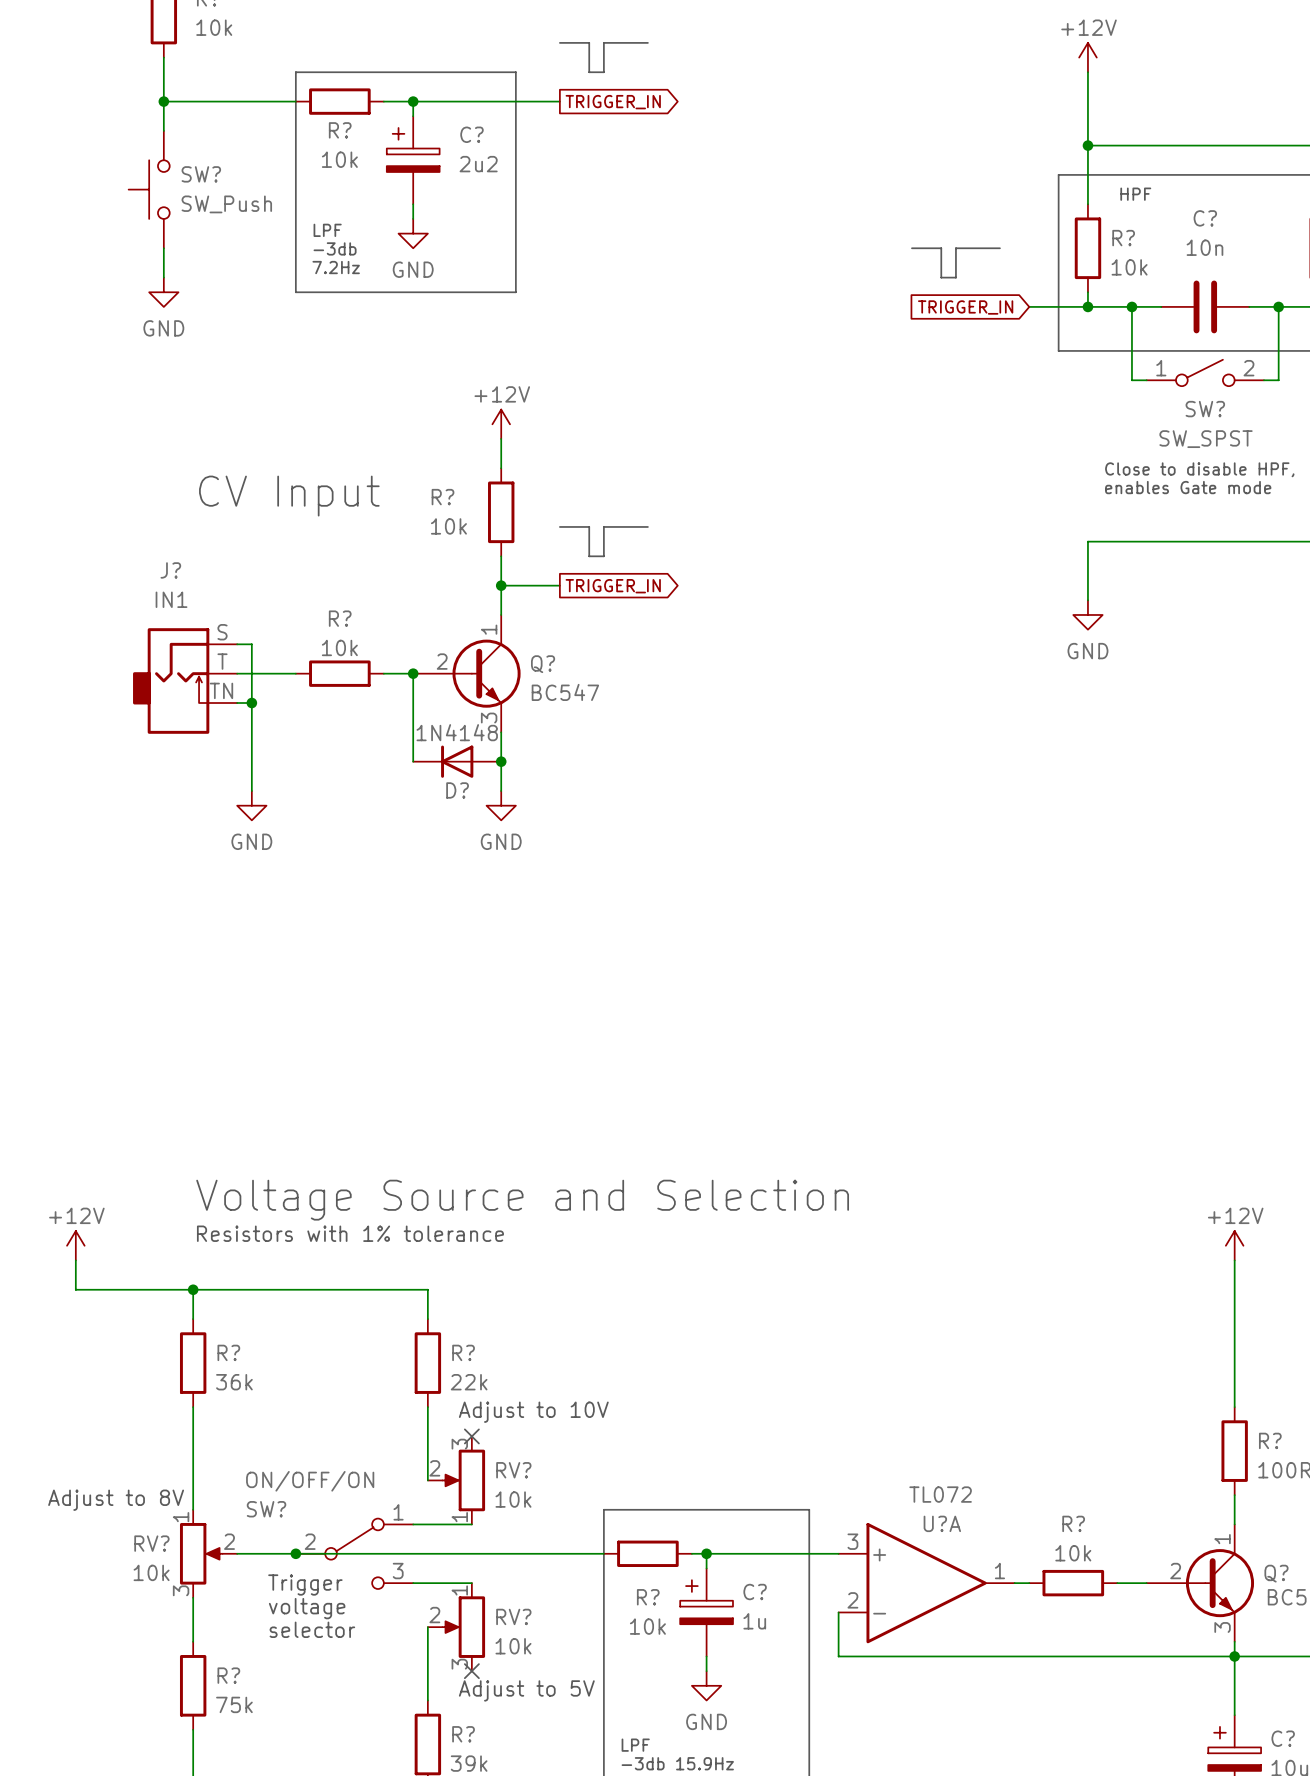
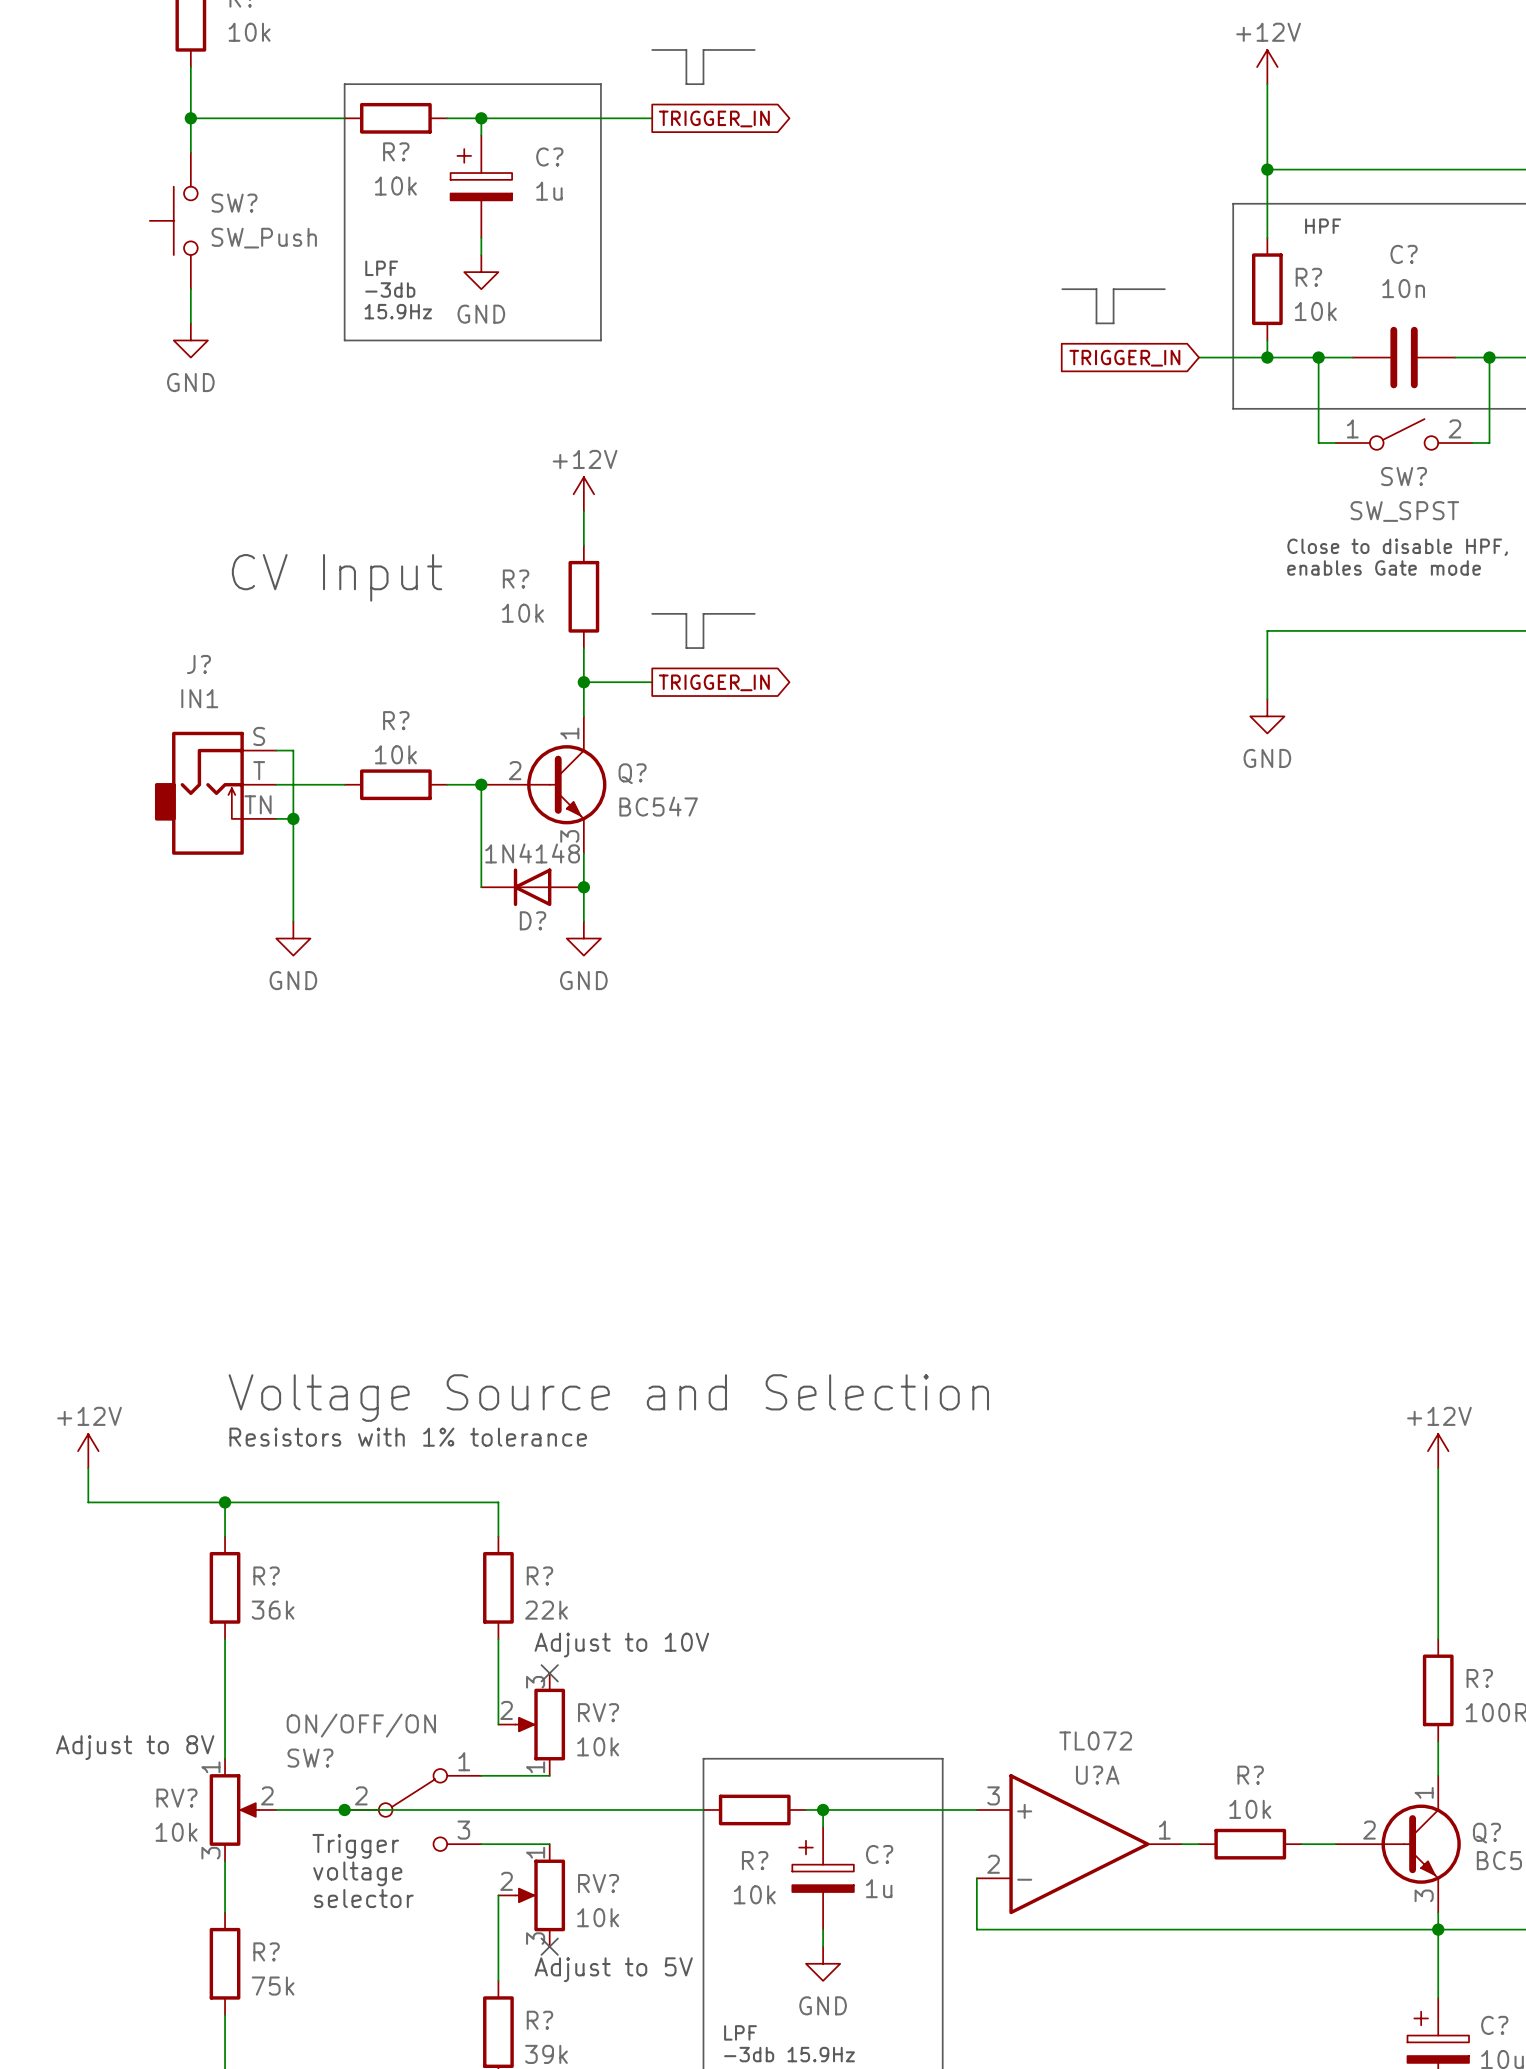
C? value: 2u2 (478, 164) -> 1u (549, 191)
text: 7.2Hz (336, 267) -> 15.9Hz (398, 311)

